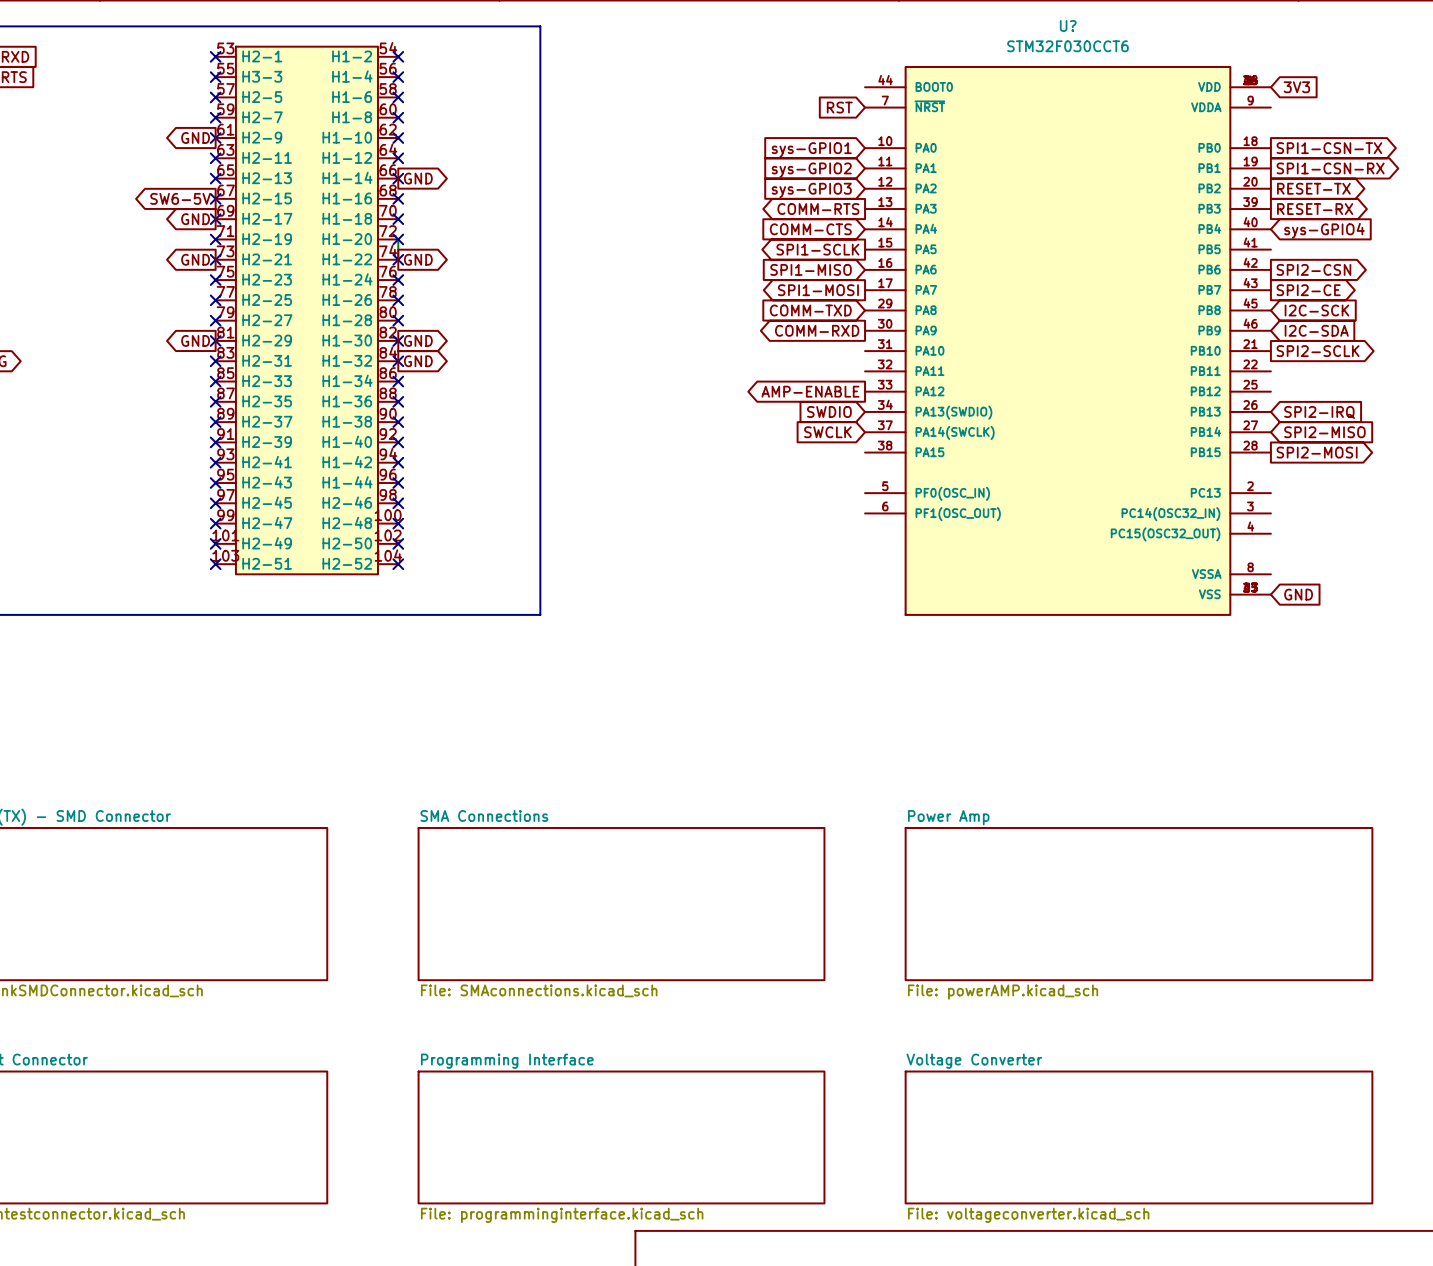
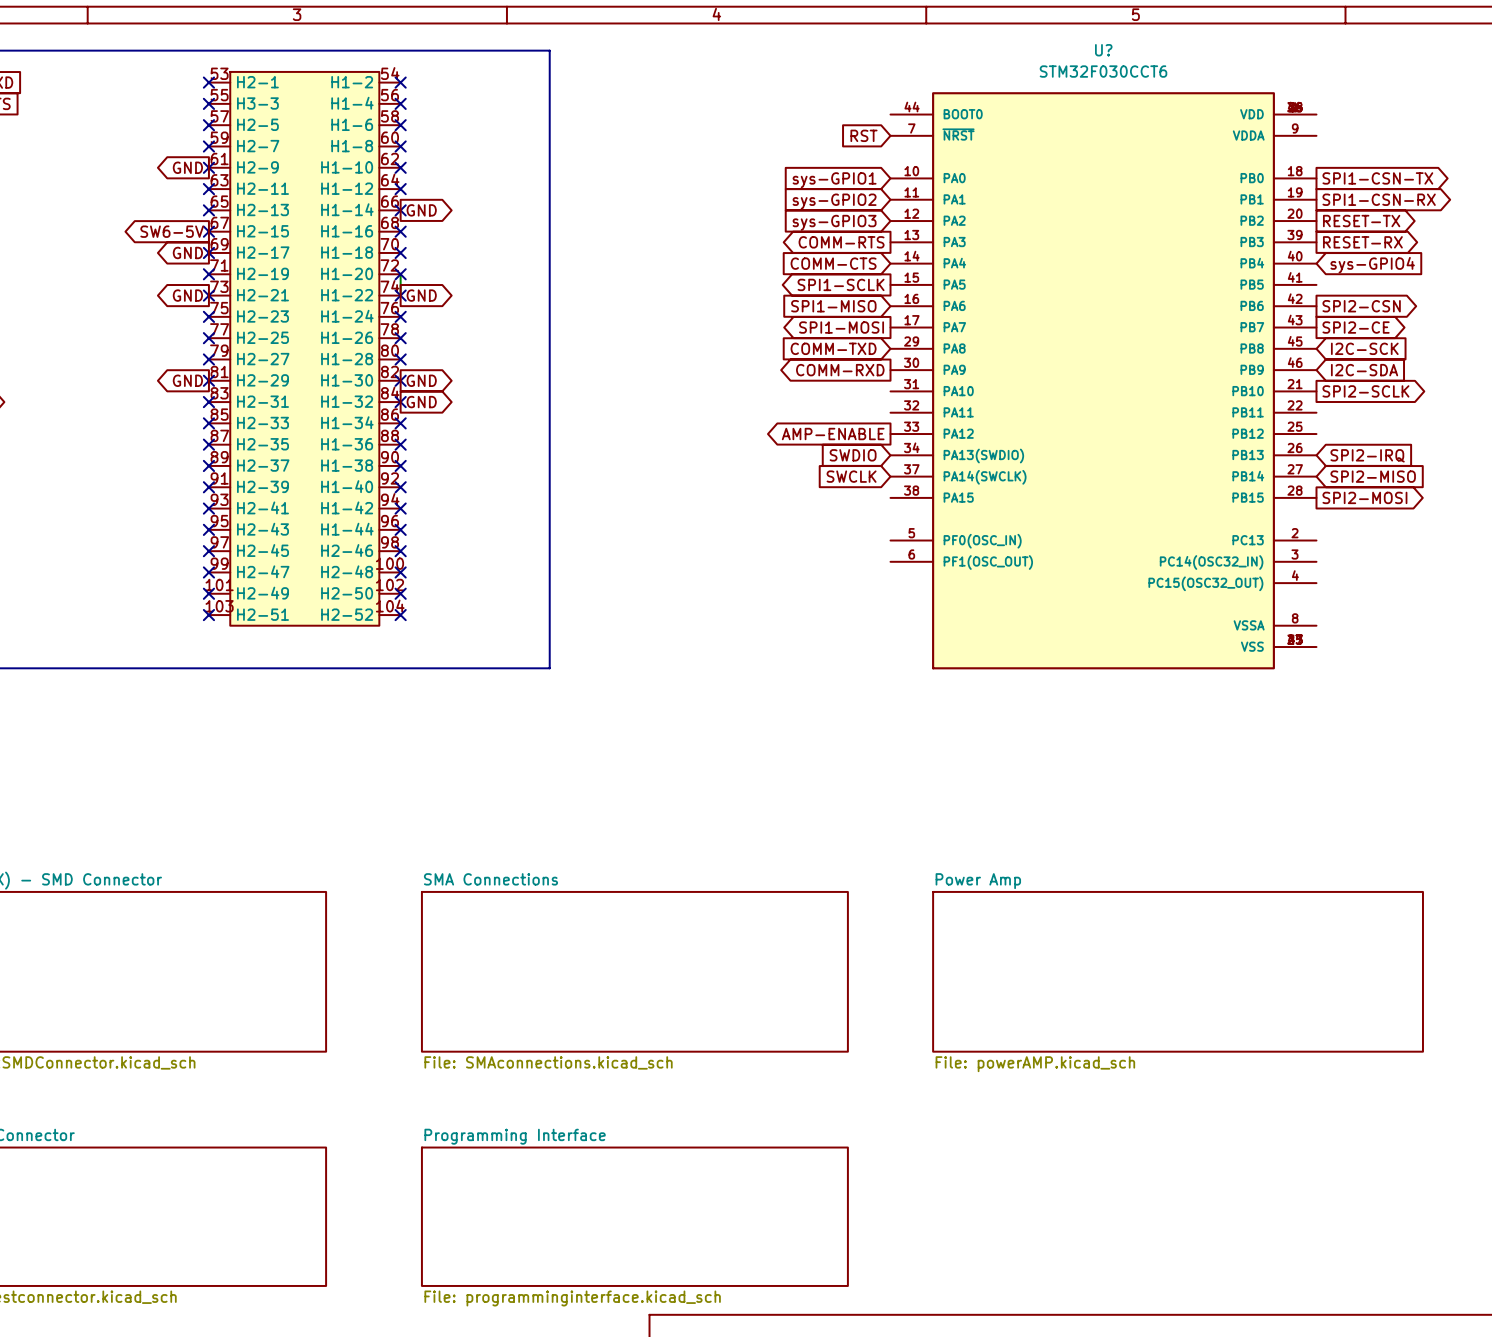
global label: 3V3 (1296, 87) -> none
global label: GND (1298, 594) -> none
sheet Voltage Converter: File: voltageconverter.kicad_sch (1139, 1137) -> none

